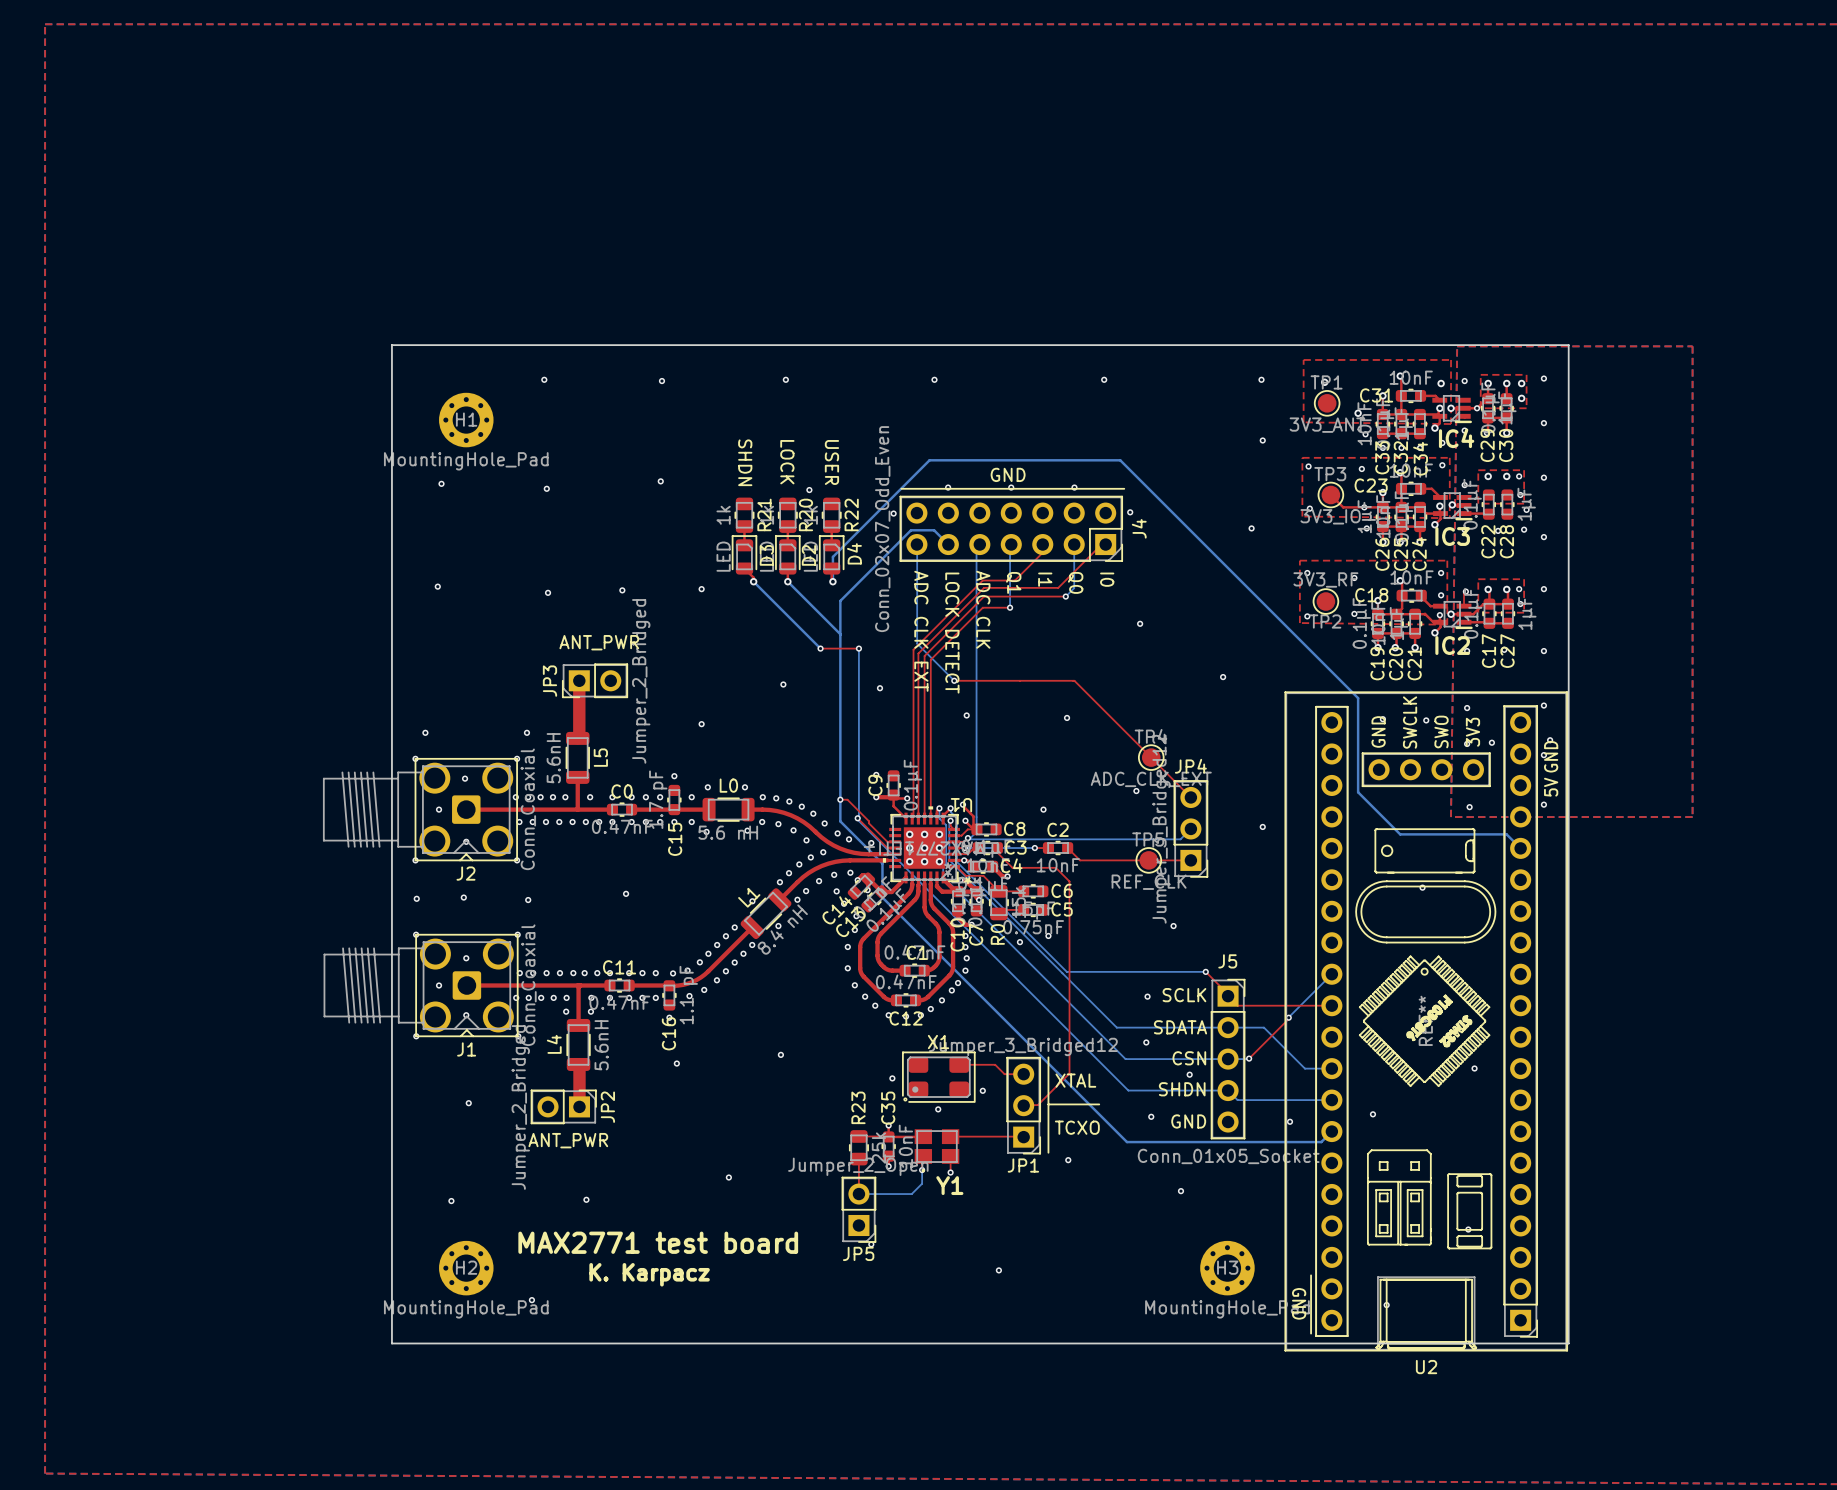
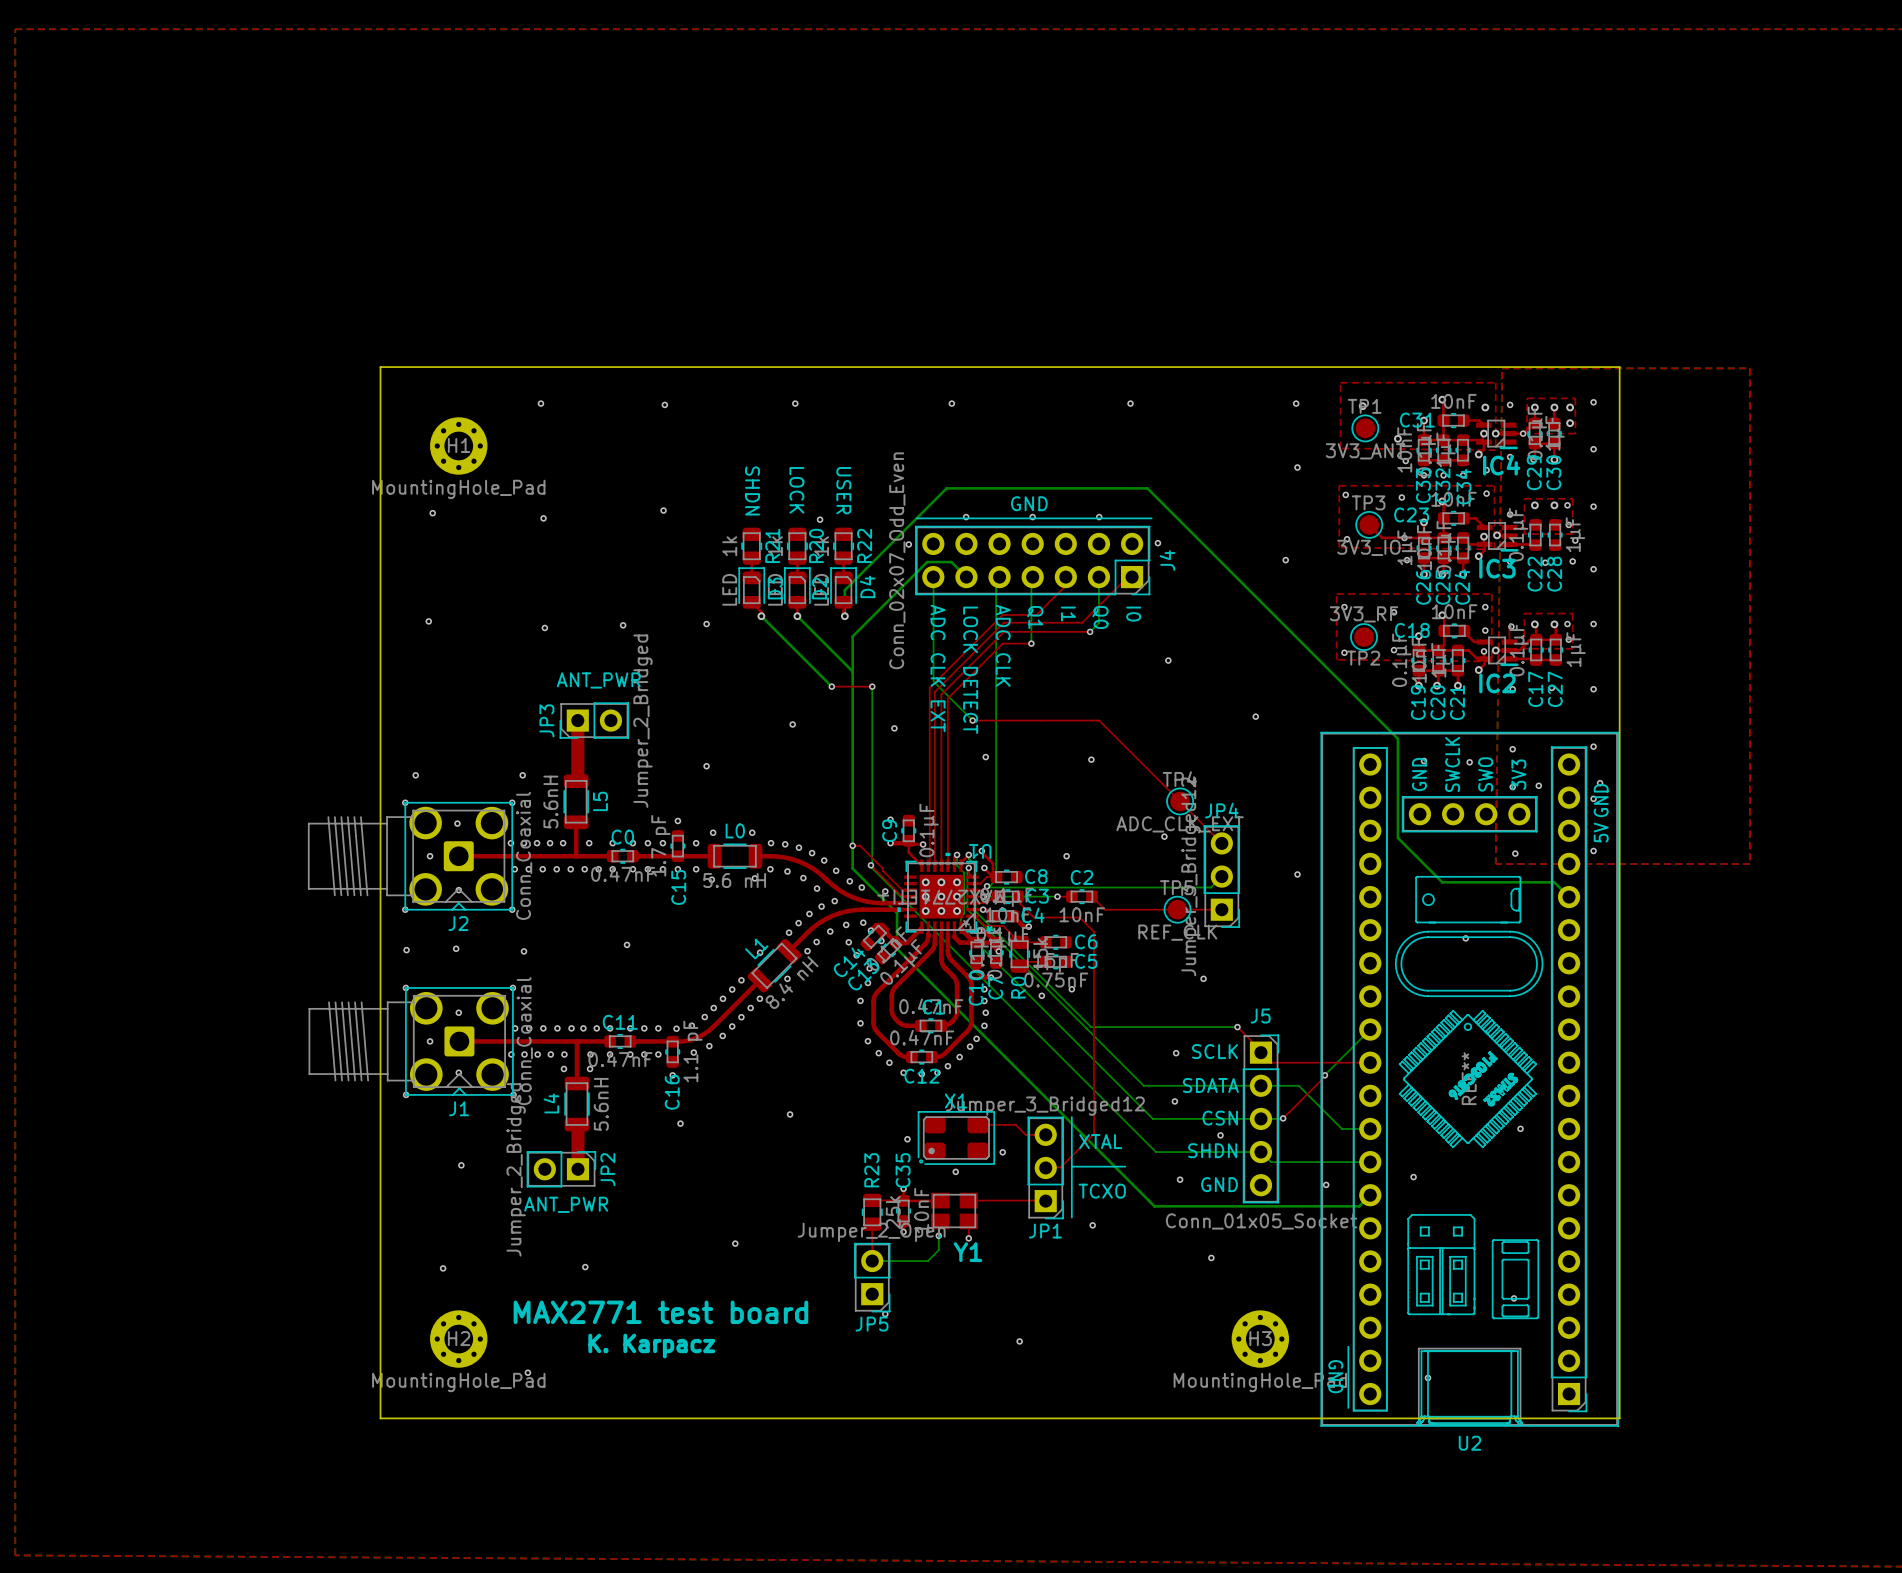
U1 footprint: [882, 806, 960, 884] -> [897, 852, 979, 934]

